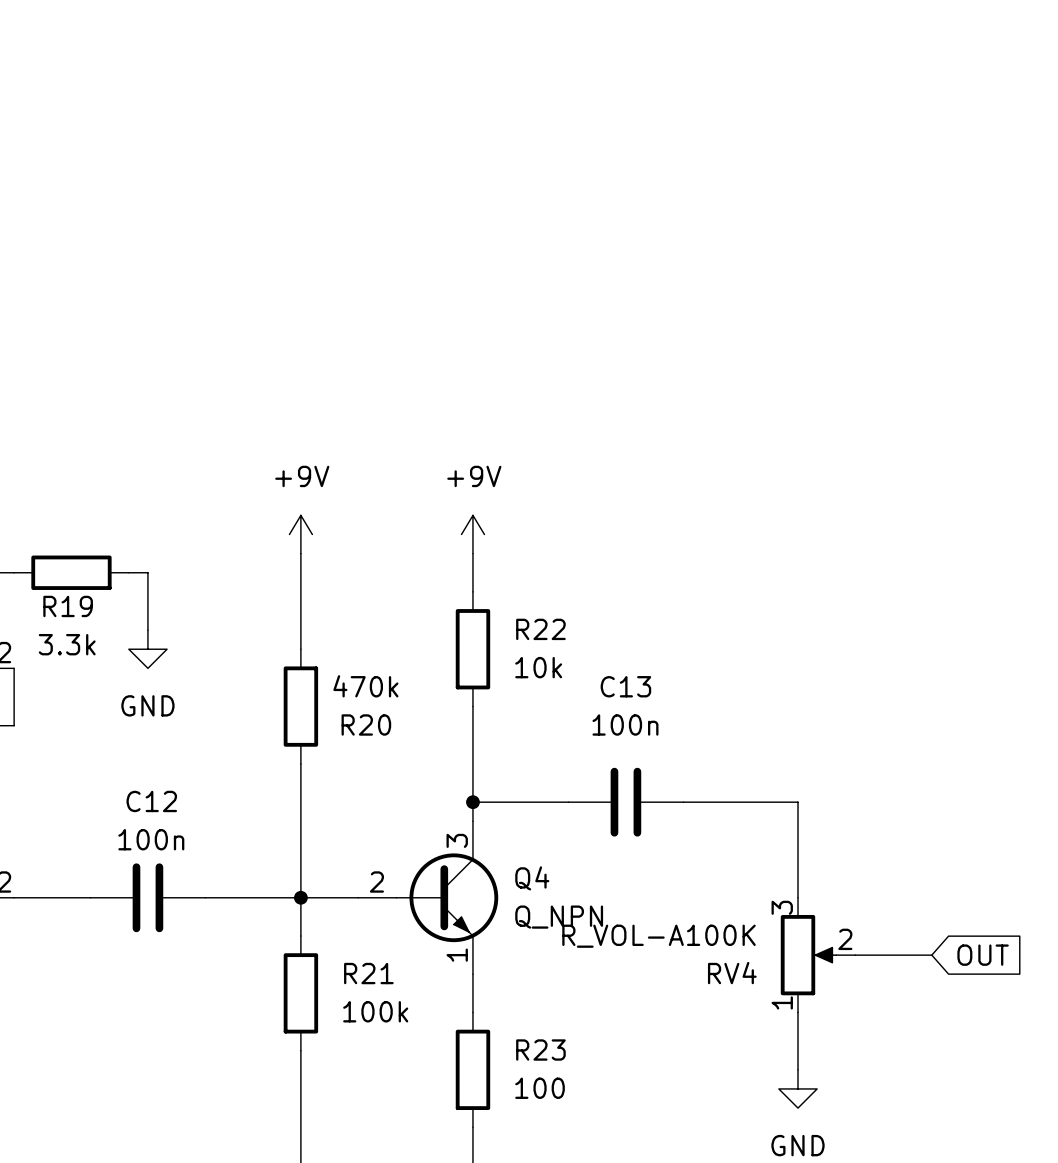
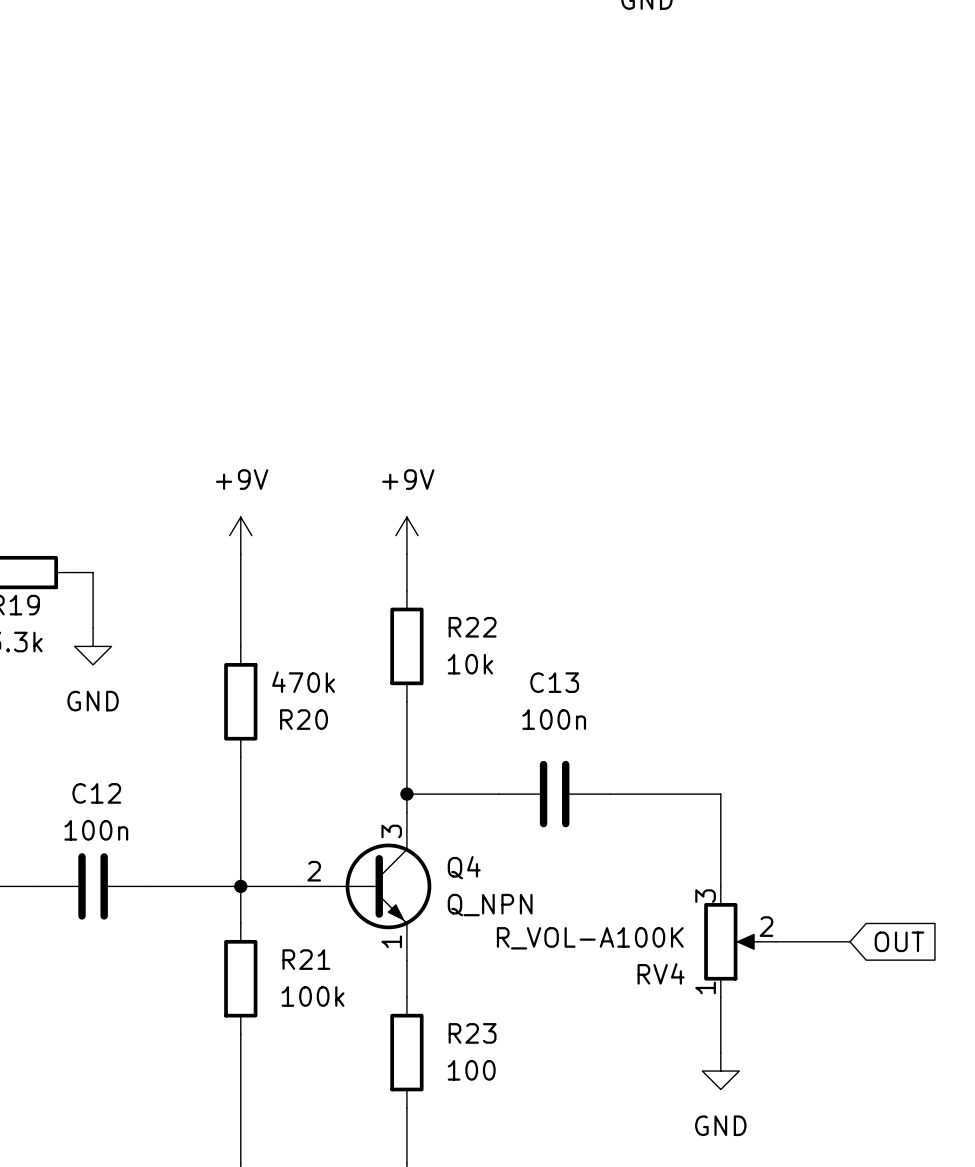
RV4 value position: R_VOL-A100K (659, 936) -> R_VOL-A100K (590, 938)
RV4 name position: RV4 (732, 973) -> RV4 (661, 973)

